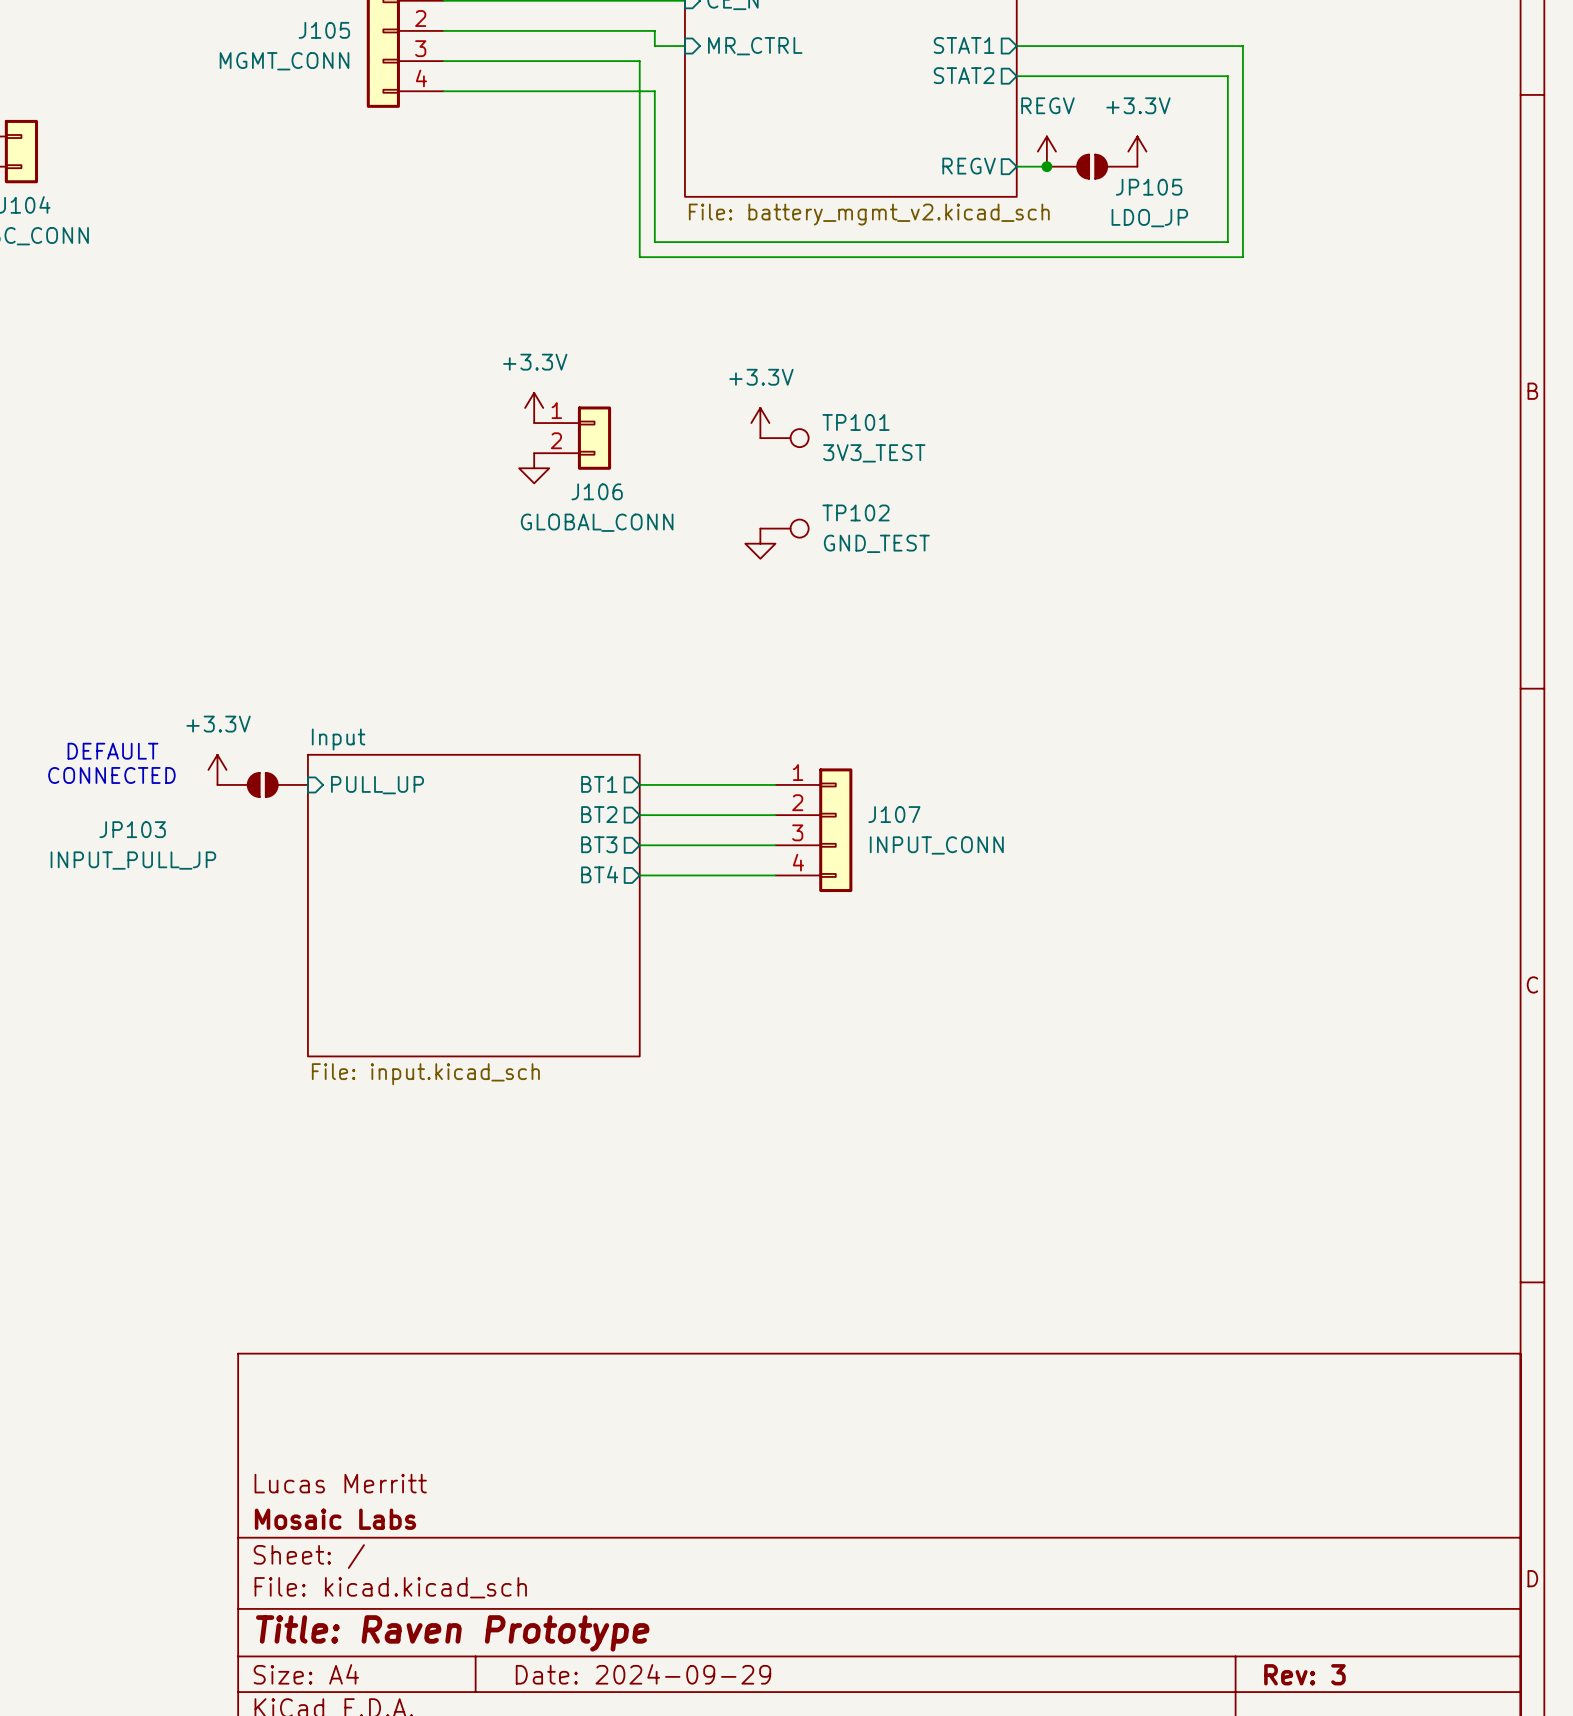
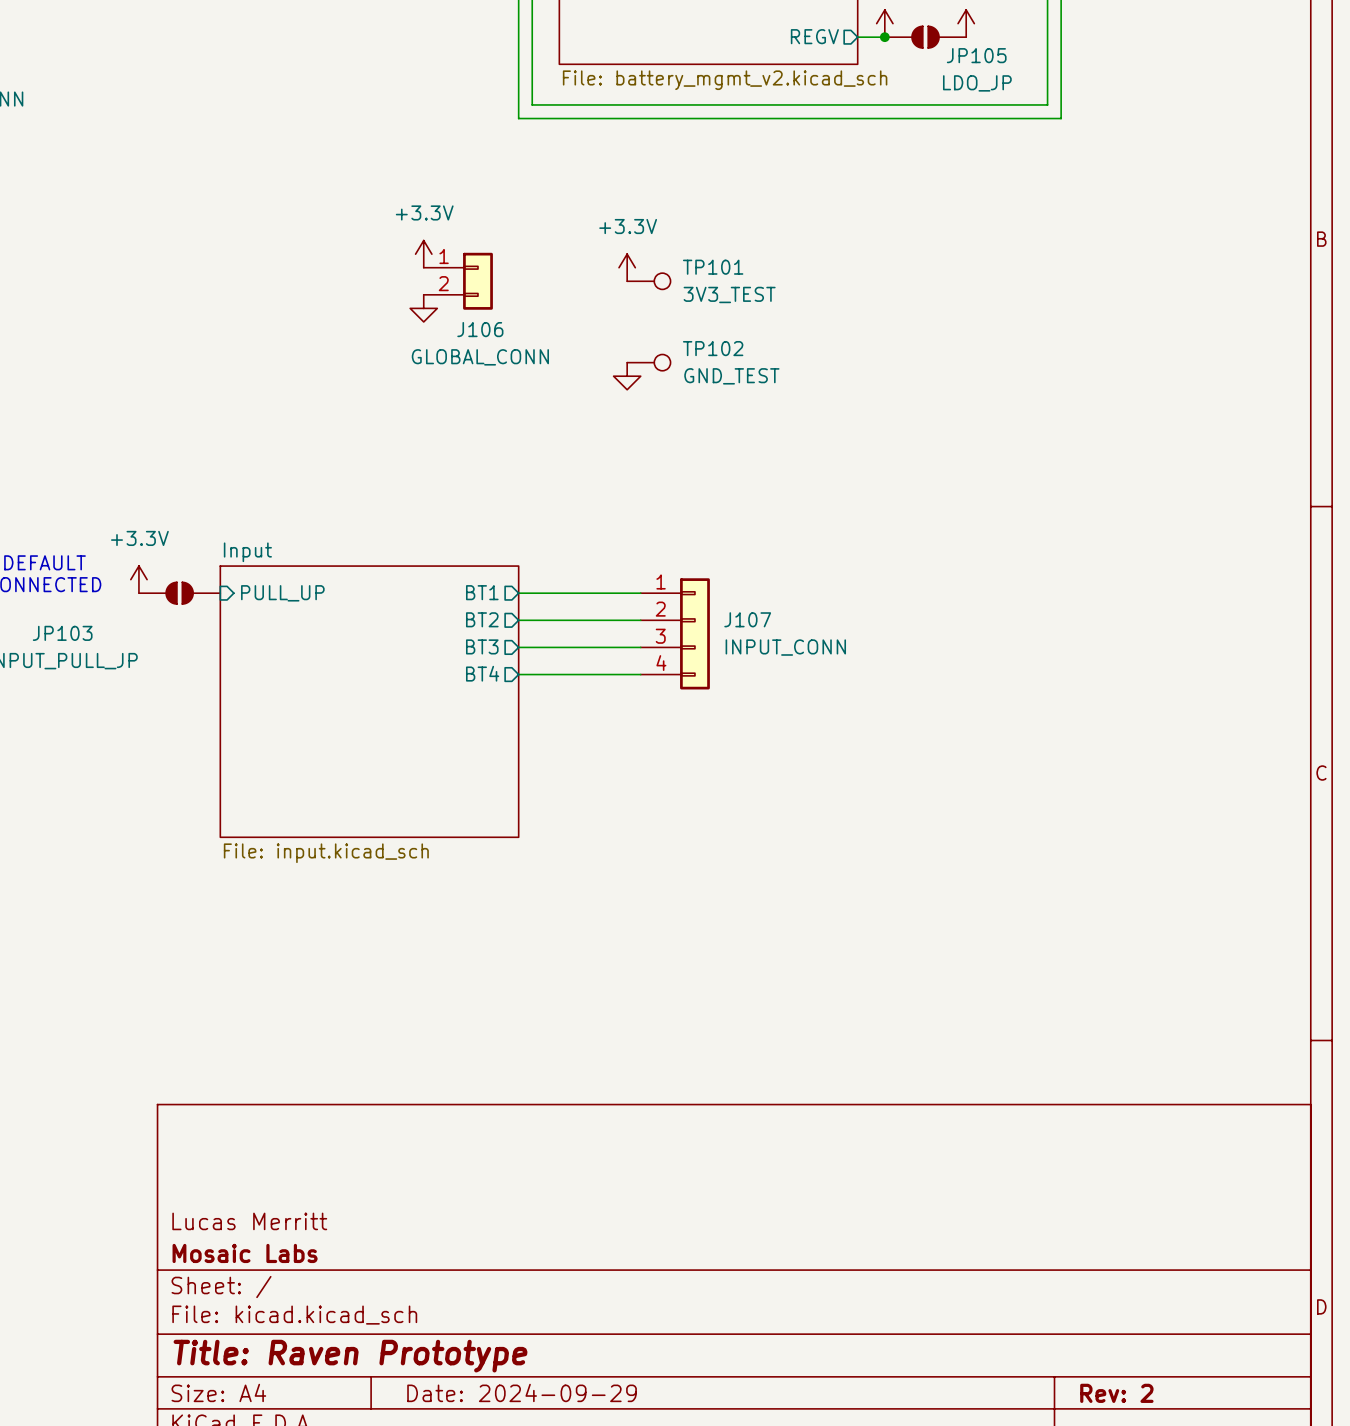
title block: Rev: 3 (1304, 1674) -> Rev: 2 (1116, 1393)

